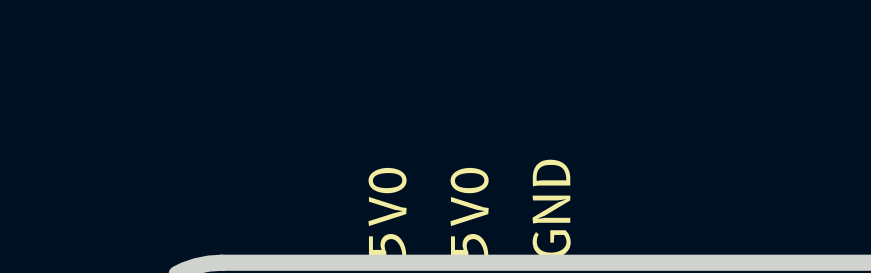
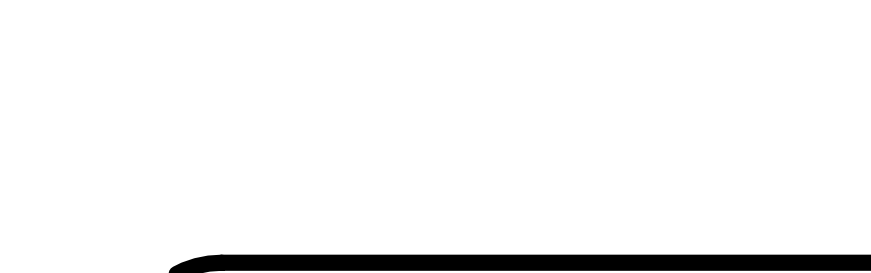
part text: GND (551, 208) -> none
part text: 5V0 (387, 211) -> none
part text: 5V0 (469, 211) -> none

